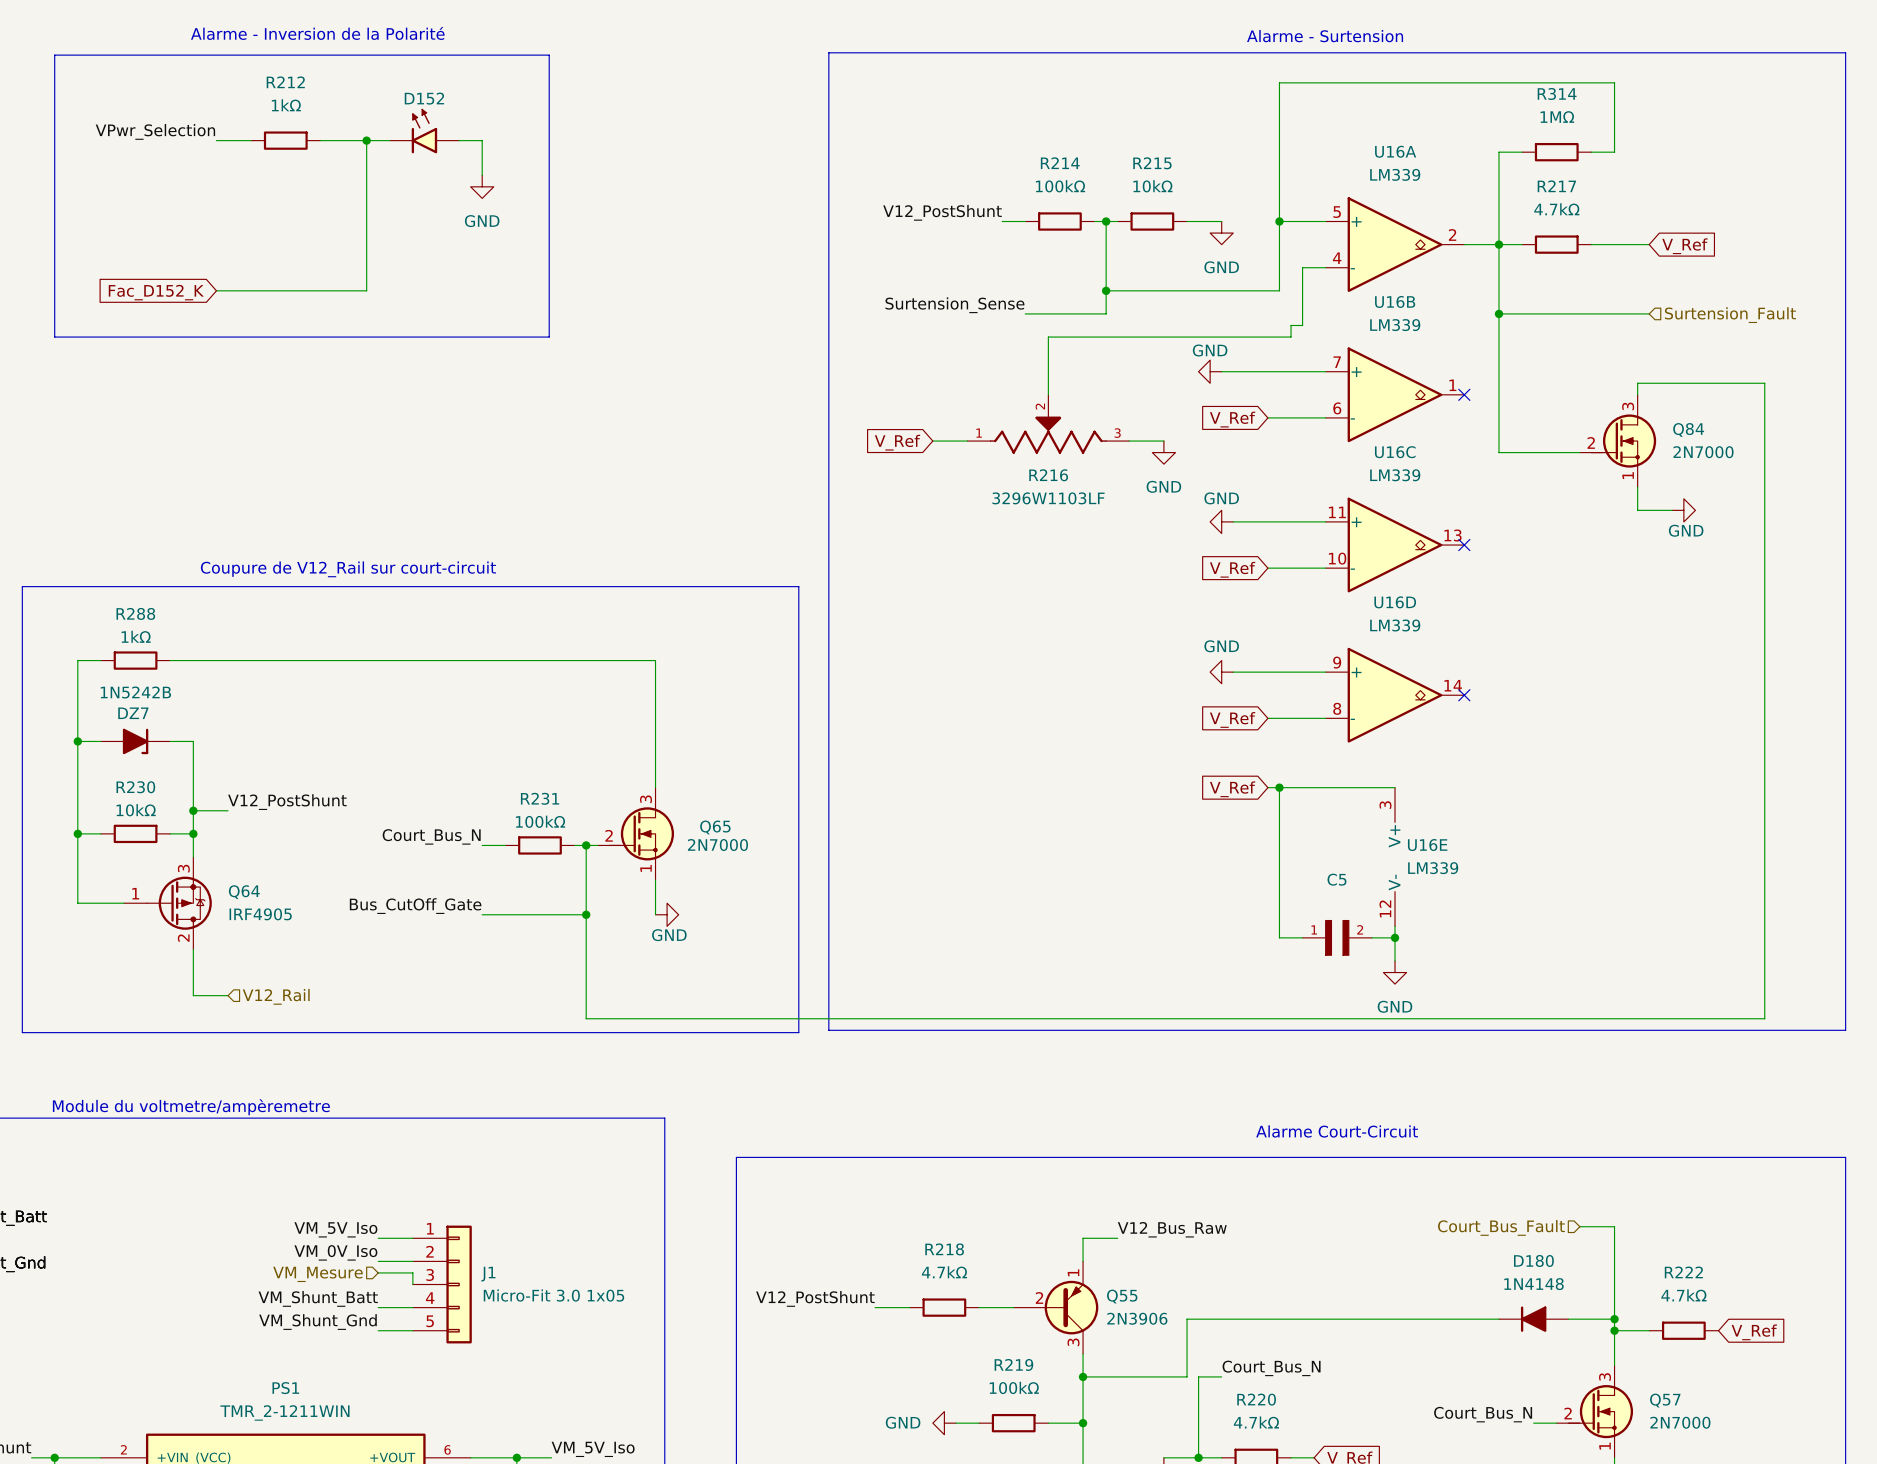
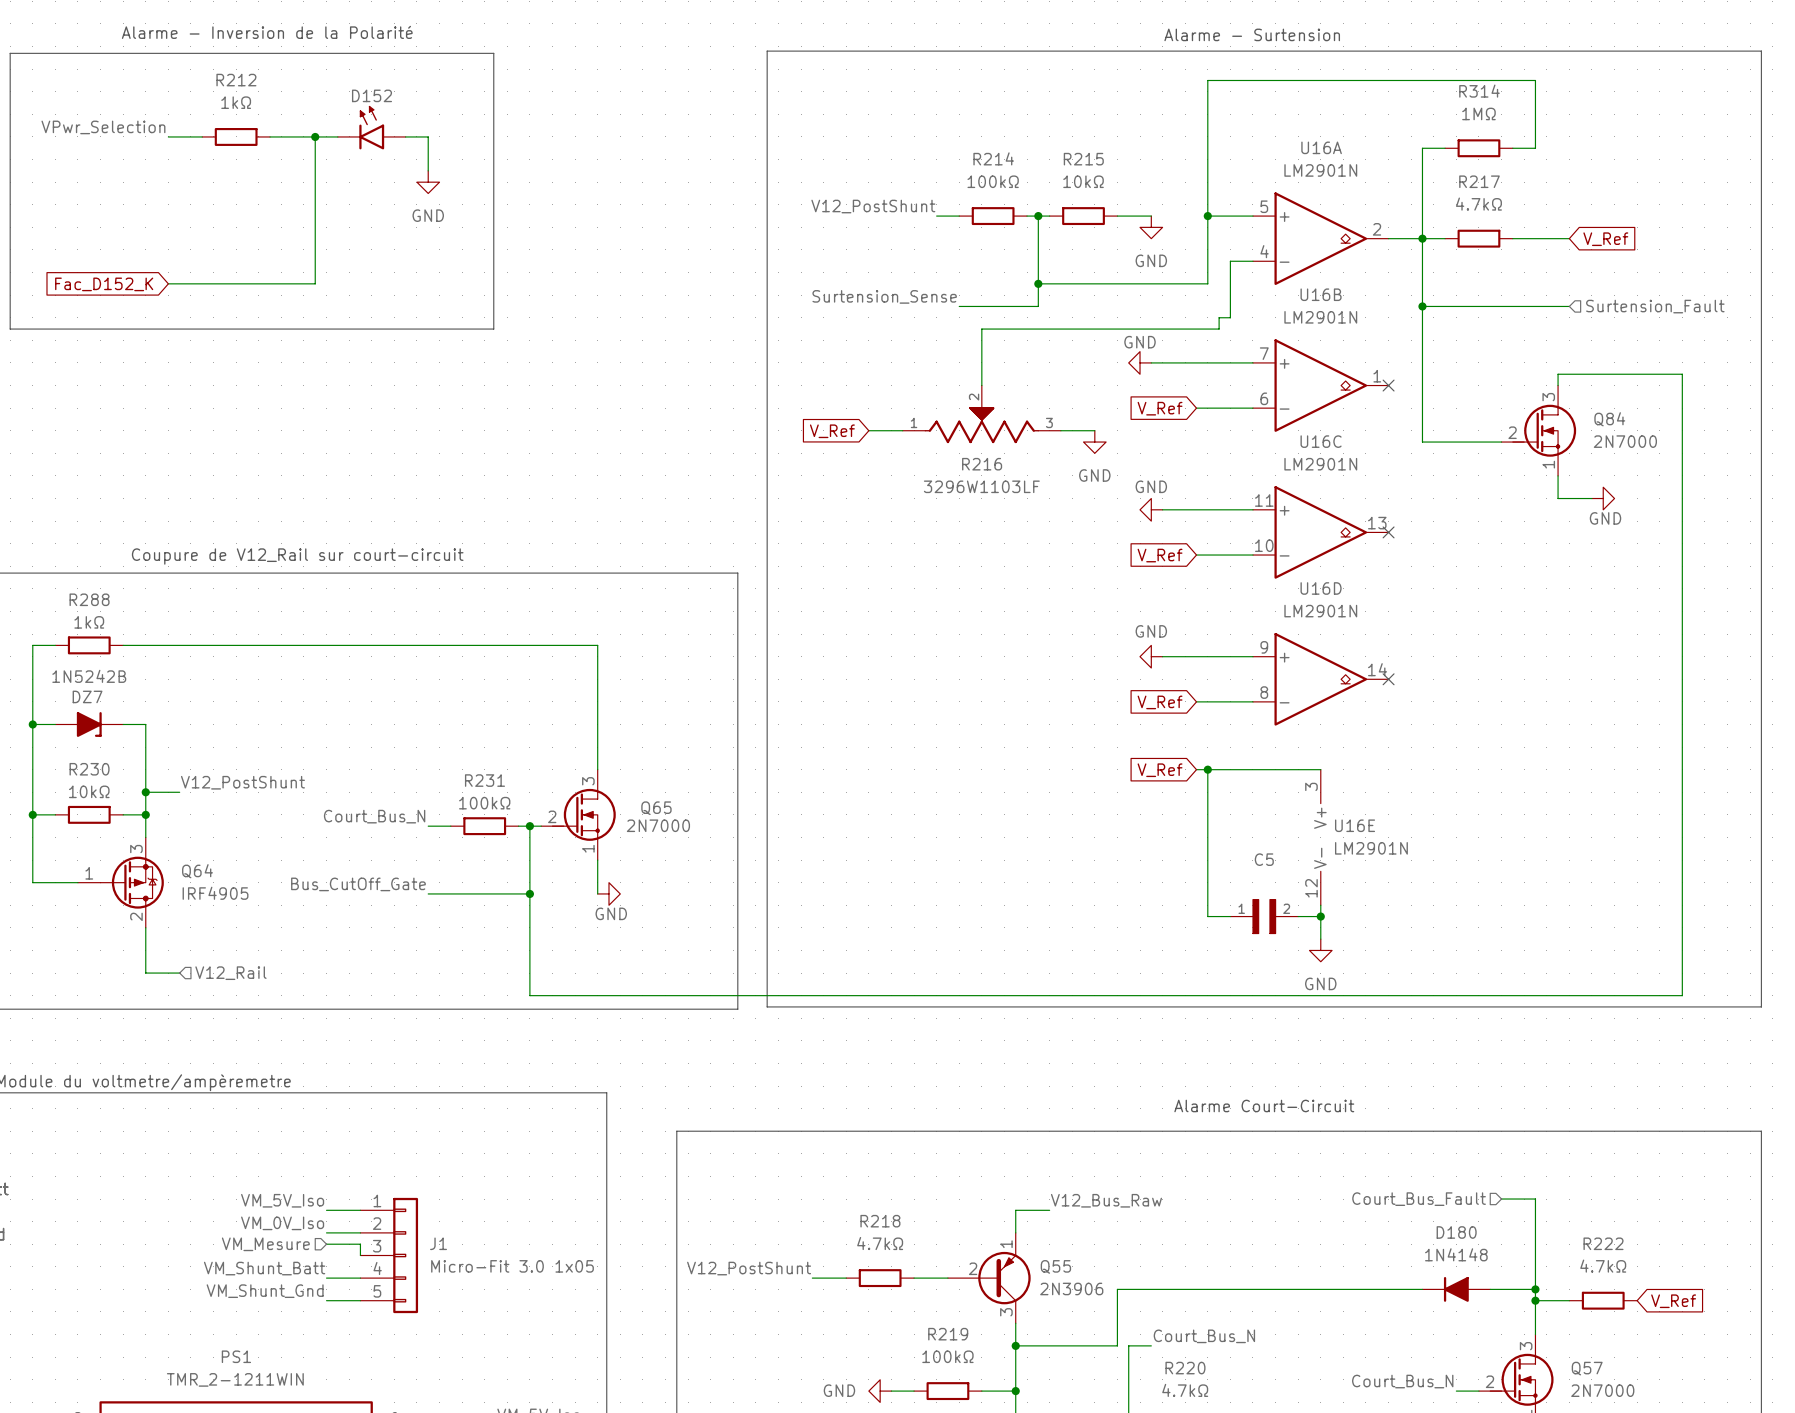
U16A value: LM339 (1395, 174) -> LM2901N (1320, 170)
U16B value: LM339 (1395, 325) -> LM2901N (1320, 317)
U16C value: LM339 (1395, 475) -> LM2901N (1320, 464)
U16D value: LM339 (1395, 625) -> LM2901N (1320, 611)
U16E value: LM339 (1433, 868) -> LM2901N (1371, 848)

